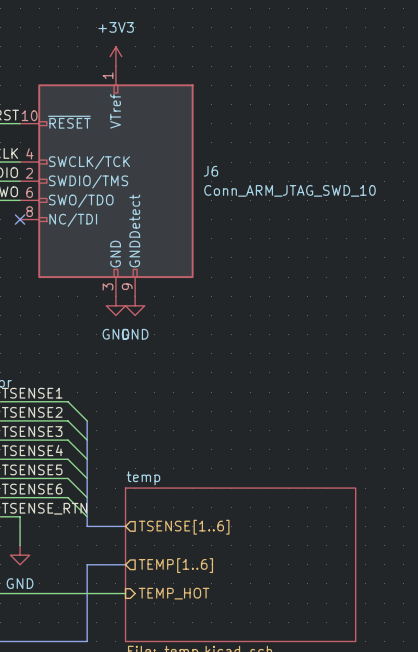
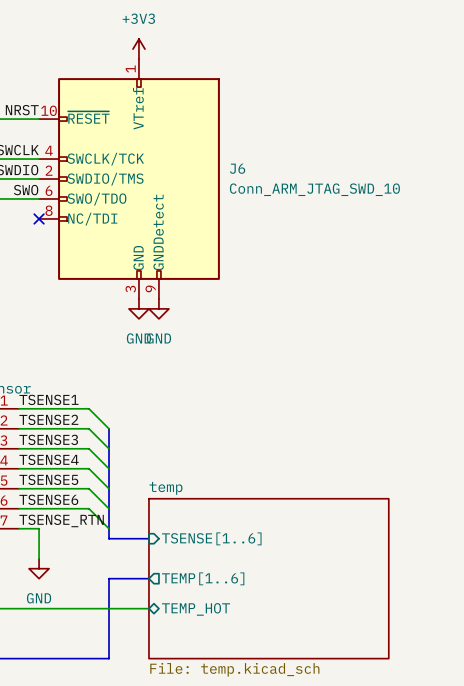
hierarchical label: TSENSE[1..6] (184, 527) -> none
sheet pin: none -> TSENSE[1..6] (211, 538)
hierarchical label: TEMP[1..6] (175, 565) -> none
sheet pin: none -> TEMP[1..6] (203, 578)
hierarchical label: TEMP_HOT (174, 593) -> none
sheet pin: none -> TEMP_HOT (196, 609)

